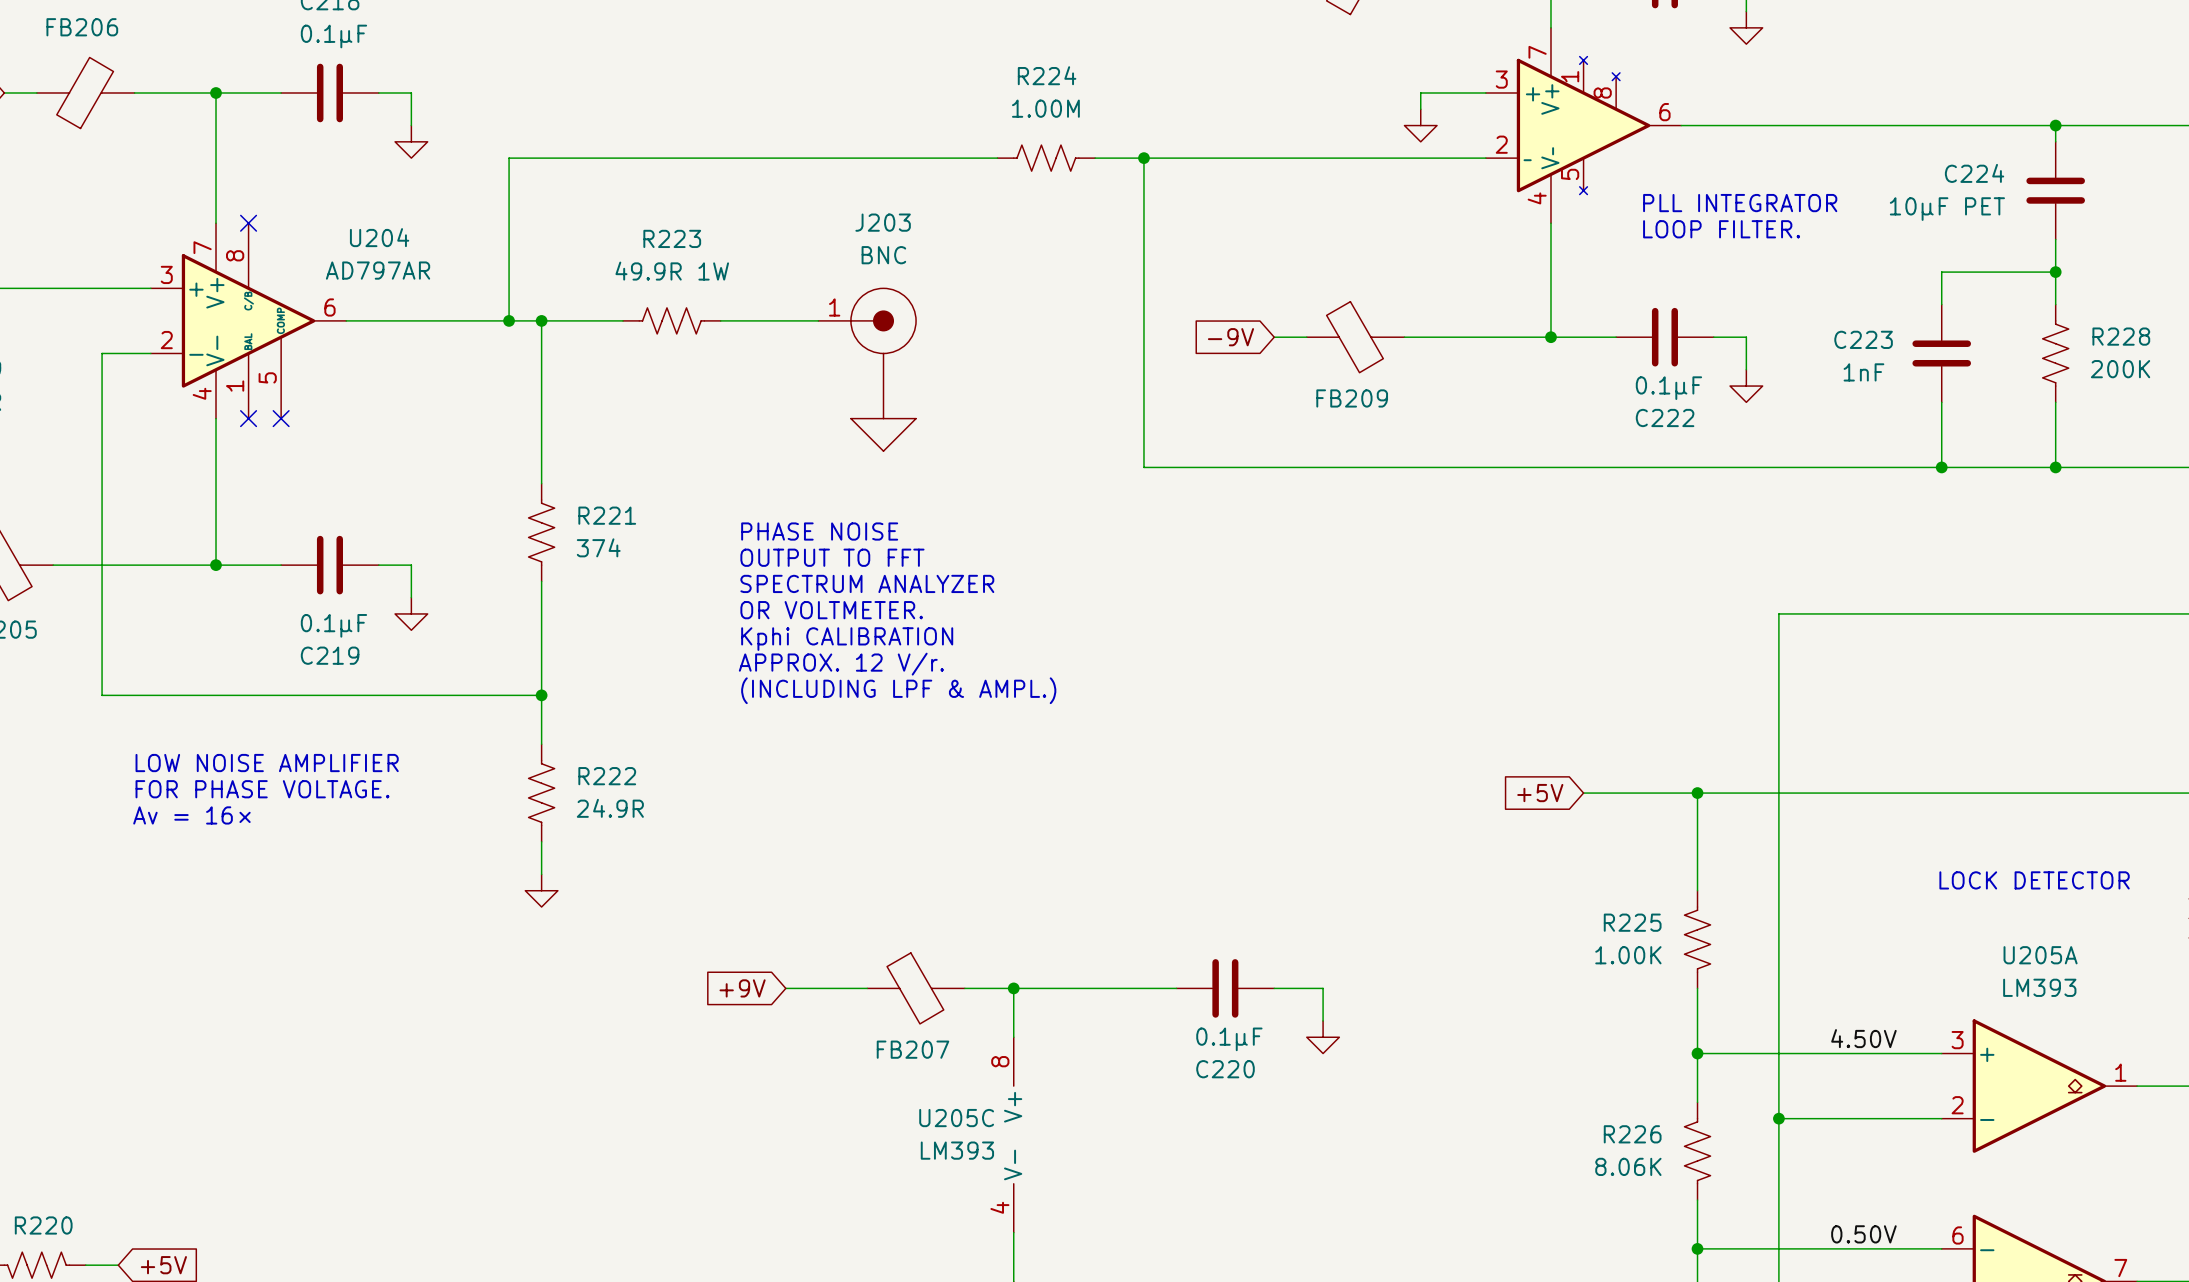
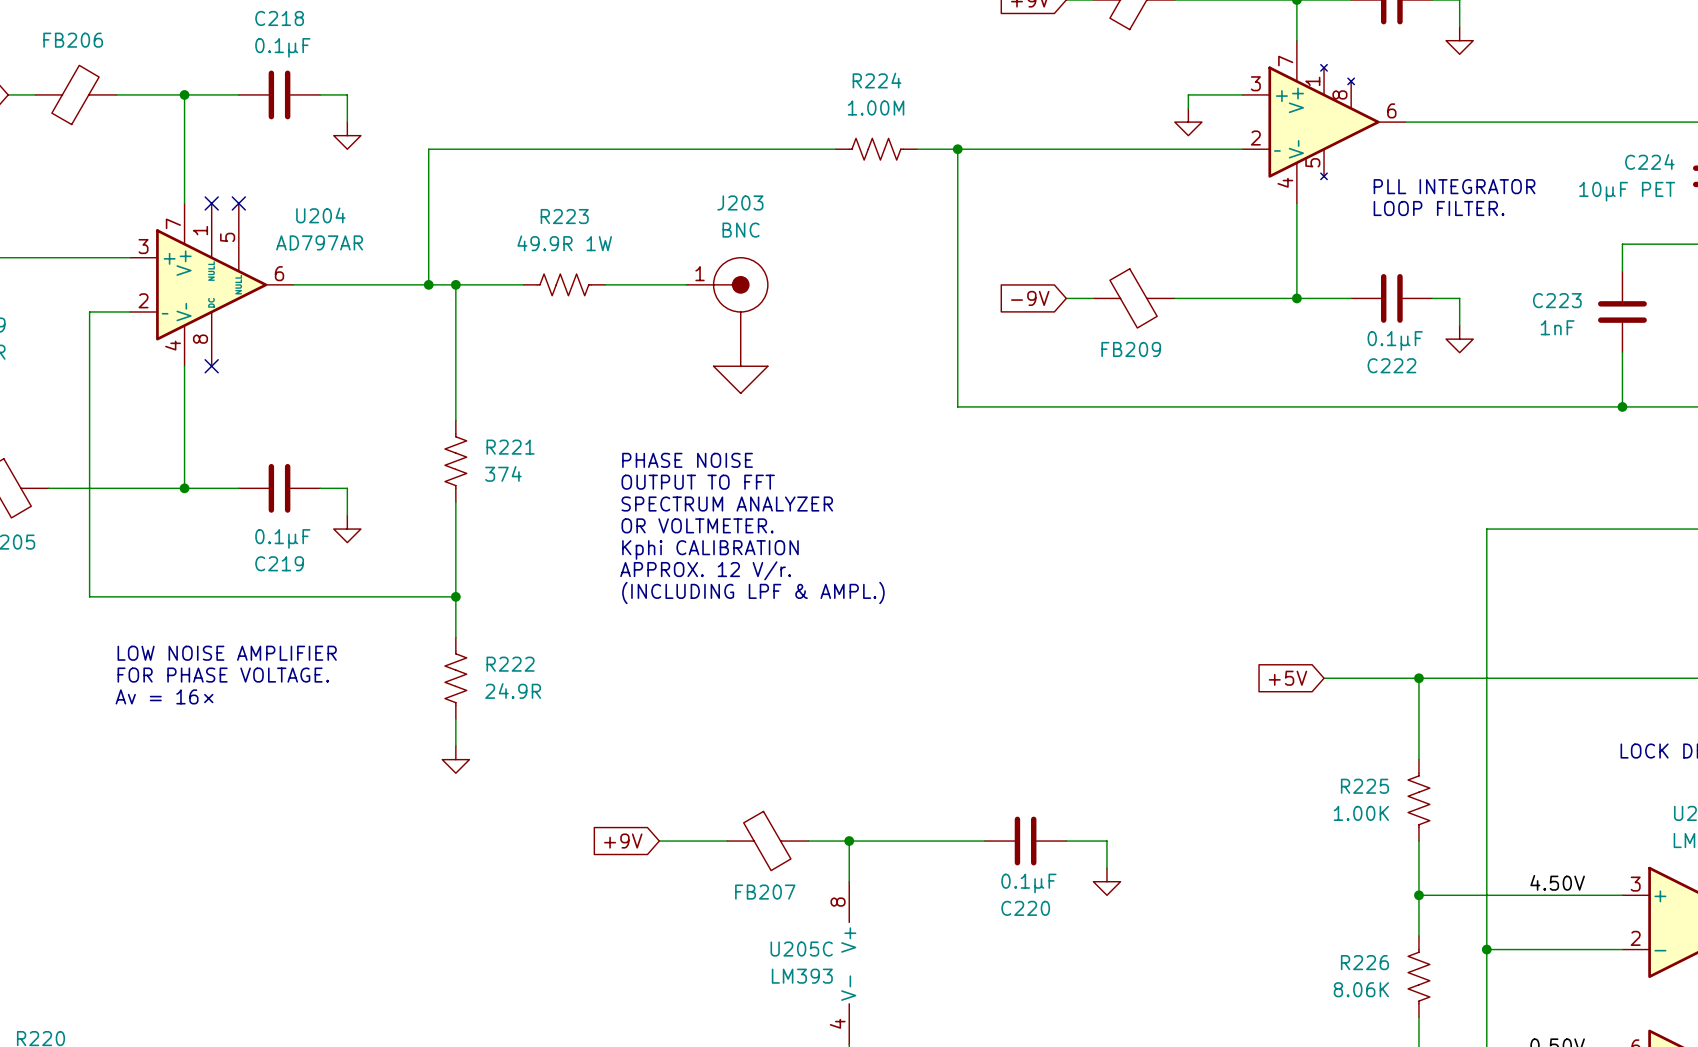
U204 symbol: [150, 223, 347, 419] -> [130, 203, 294, 367]
no-connect mark: none -> (238, 203)
no-connect mark: (281, 418) -> none

